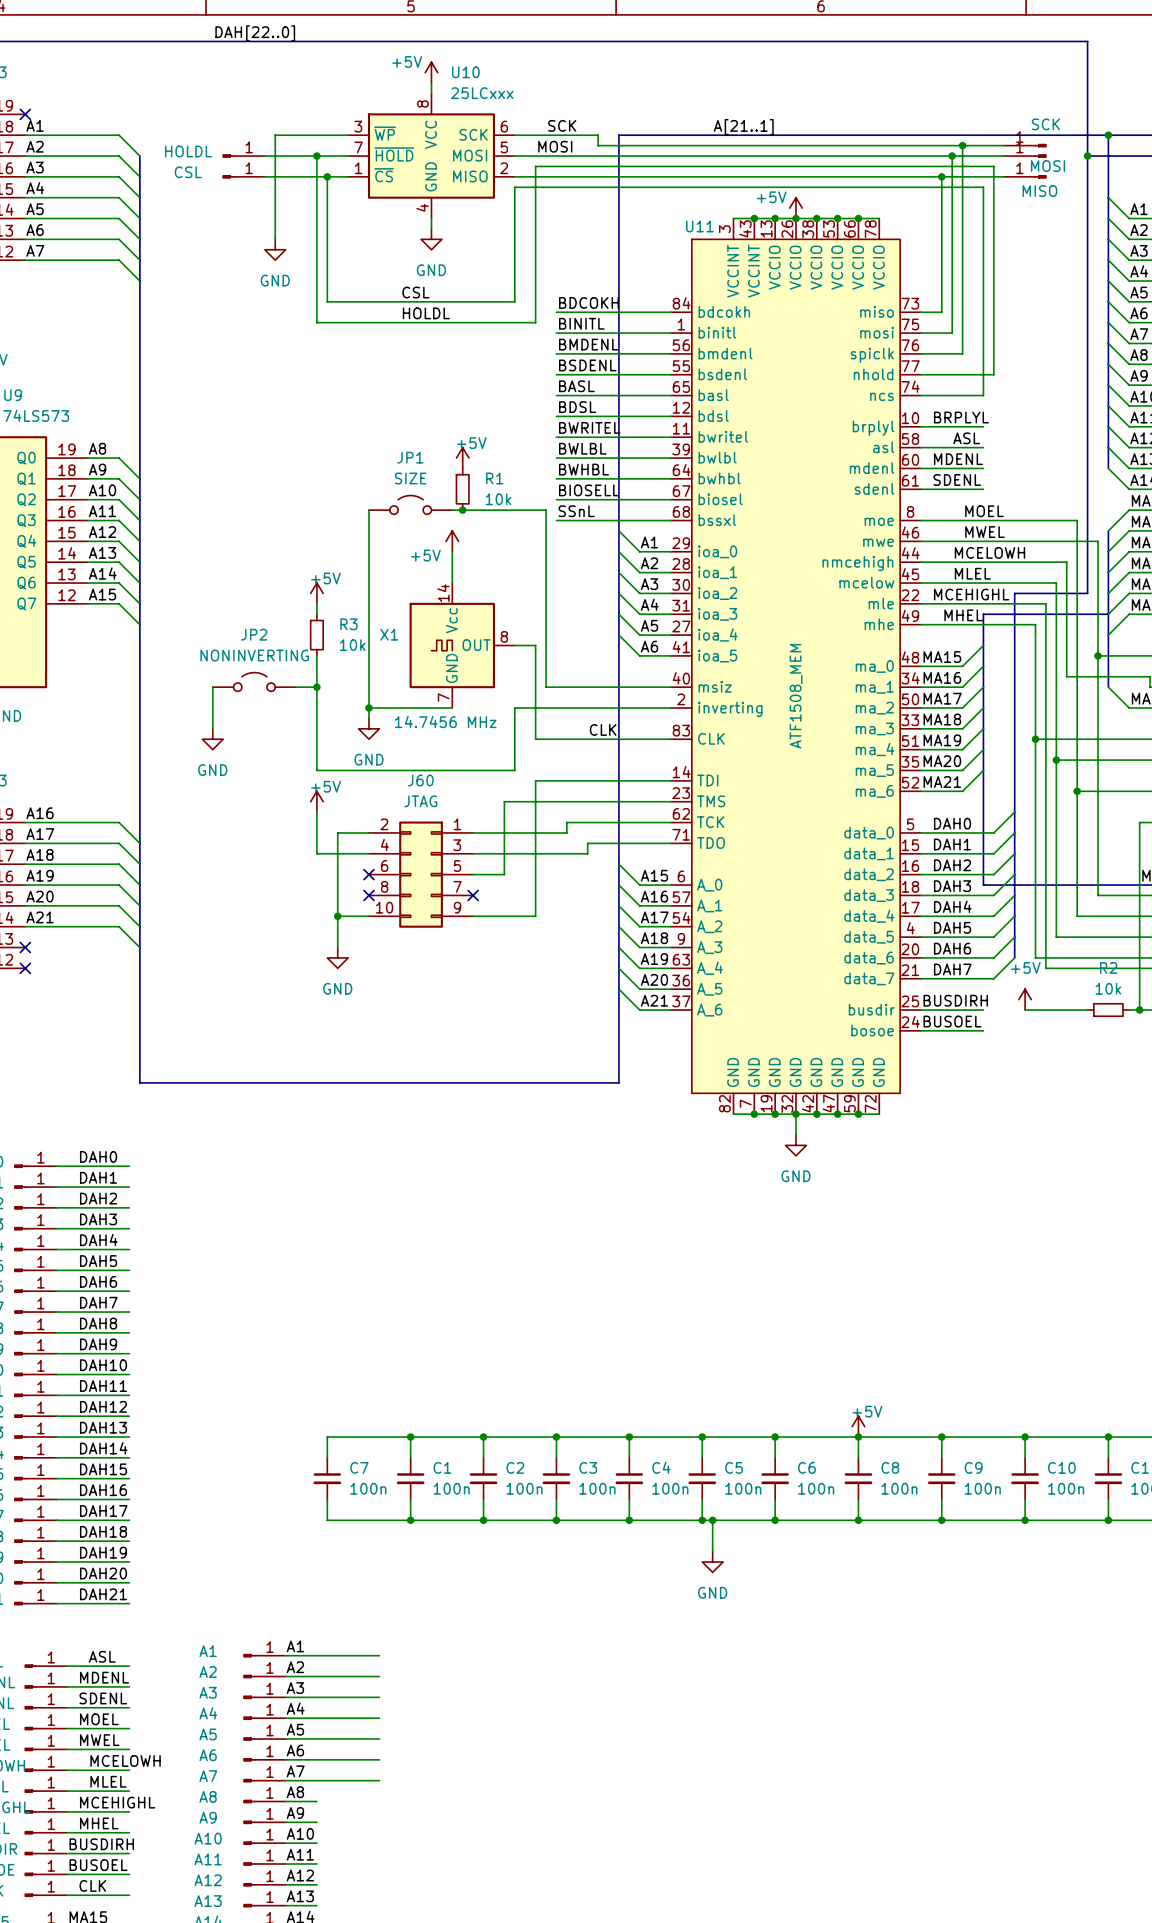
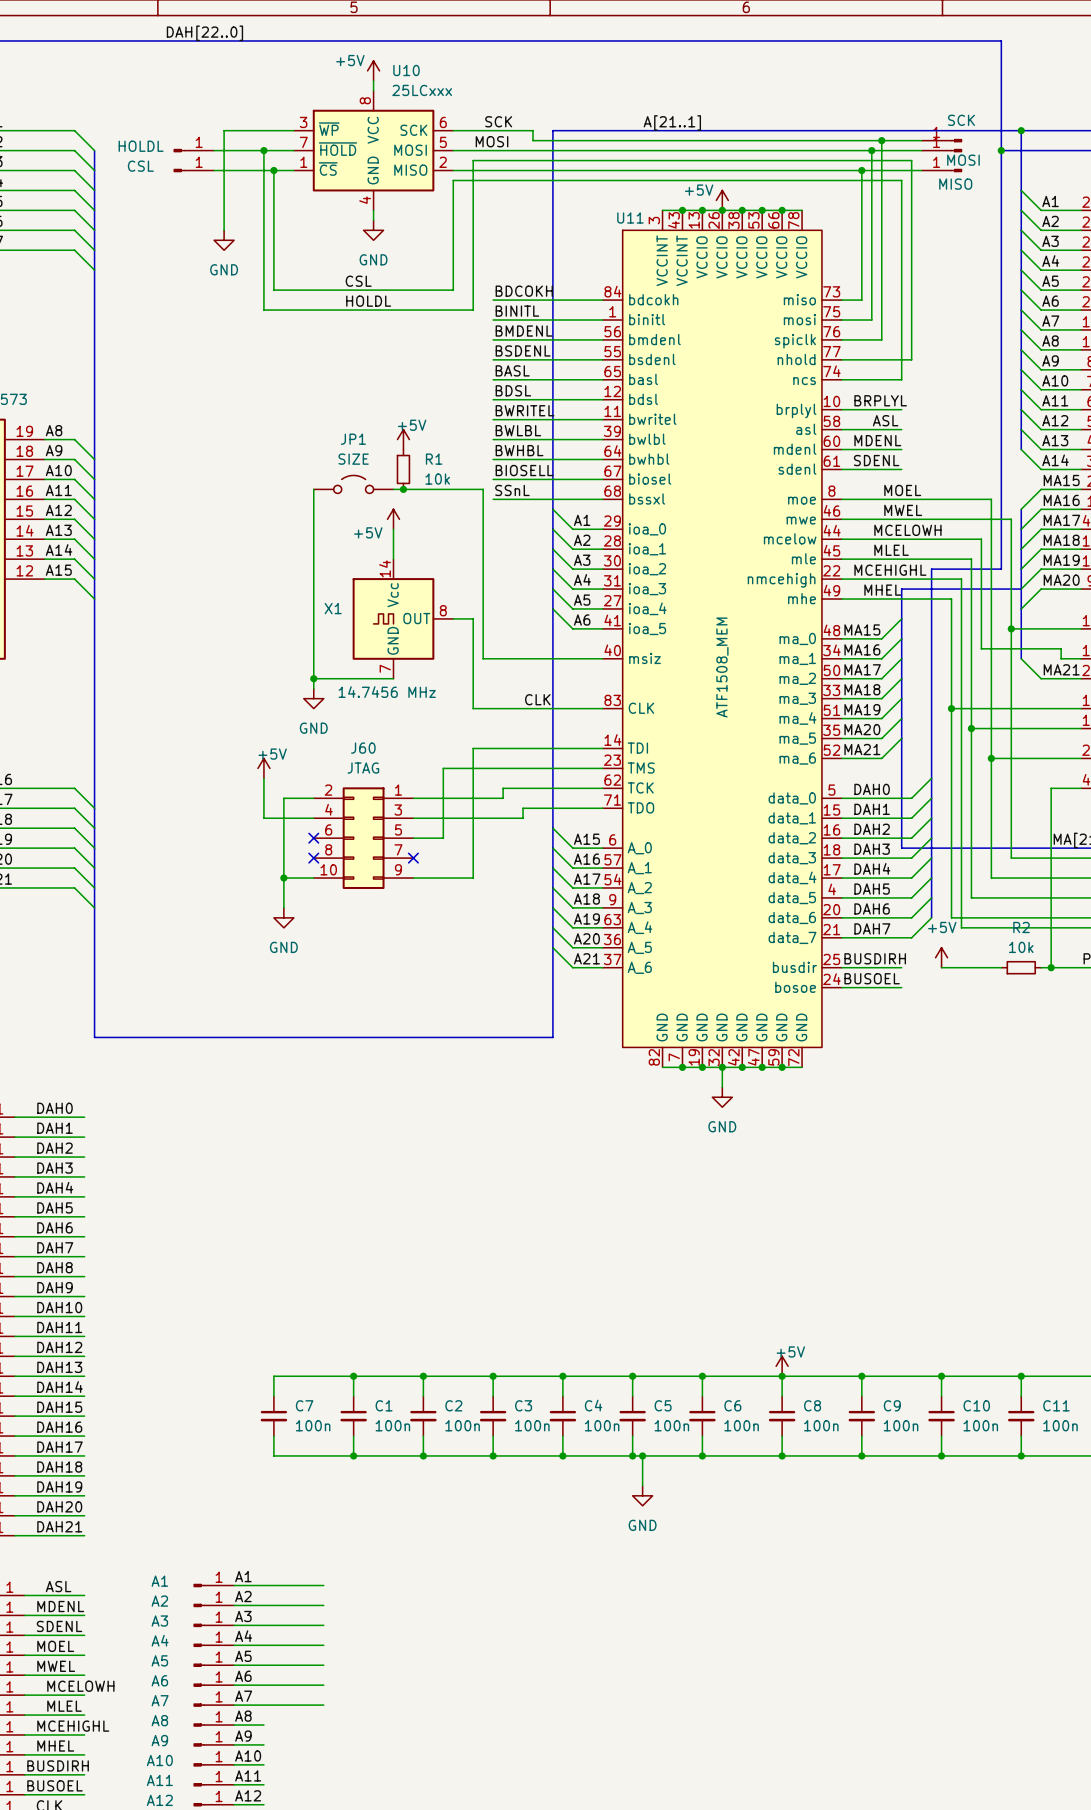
U11 symbol: [671, 218, 921, 1115] -> [602, 210, 842, 1068]
power symbol: +5V (316, 593) -> none
wire: (316, 603) (316, 614) -> none
R3: 10k (316, 635) -> none
wire: (316, 655) (316, 770) (514, 770) (514, 707) (671, 707) -> none
JP2: NONINVERTING (254, 681) -> none
wire: (212, 687) (212, 728) -> none
wire: (296, 687) (316, 687) -> none
junction: (316, 687) -> none
power symbol: GND (212, 739) -> none

